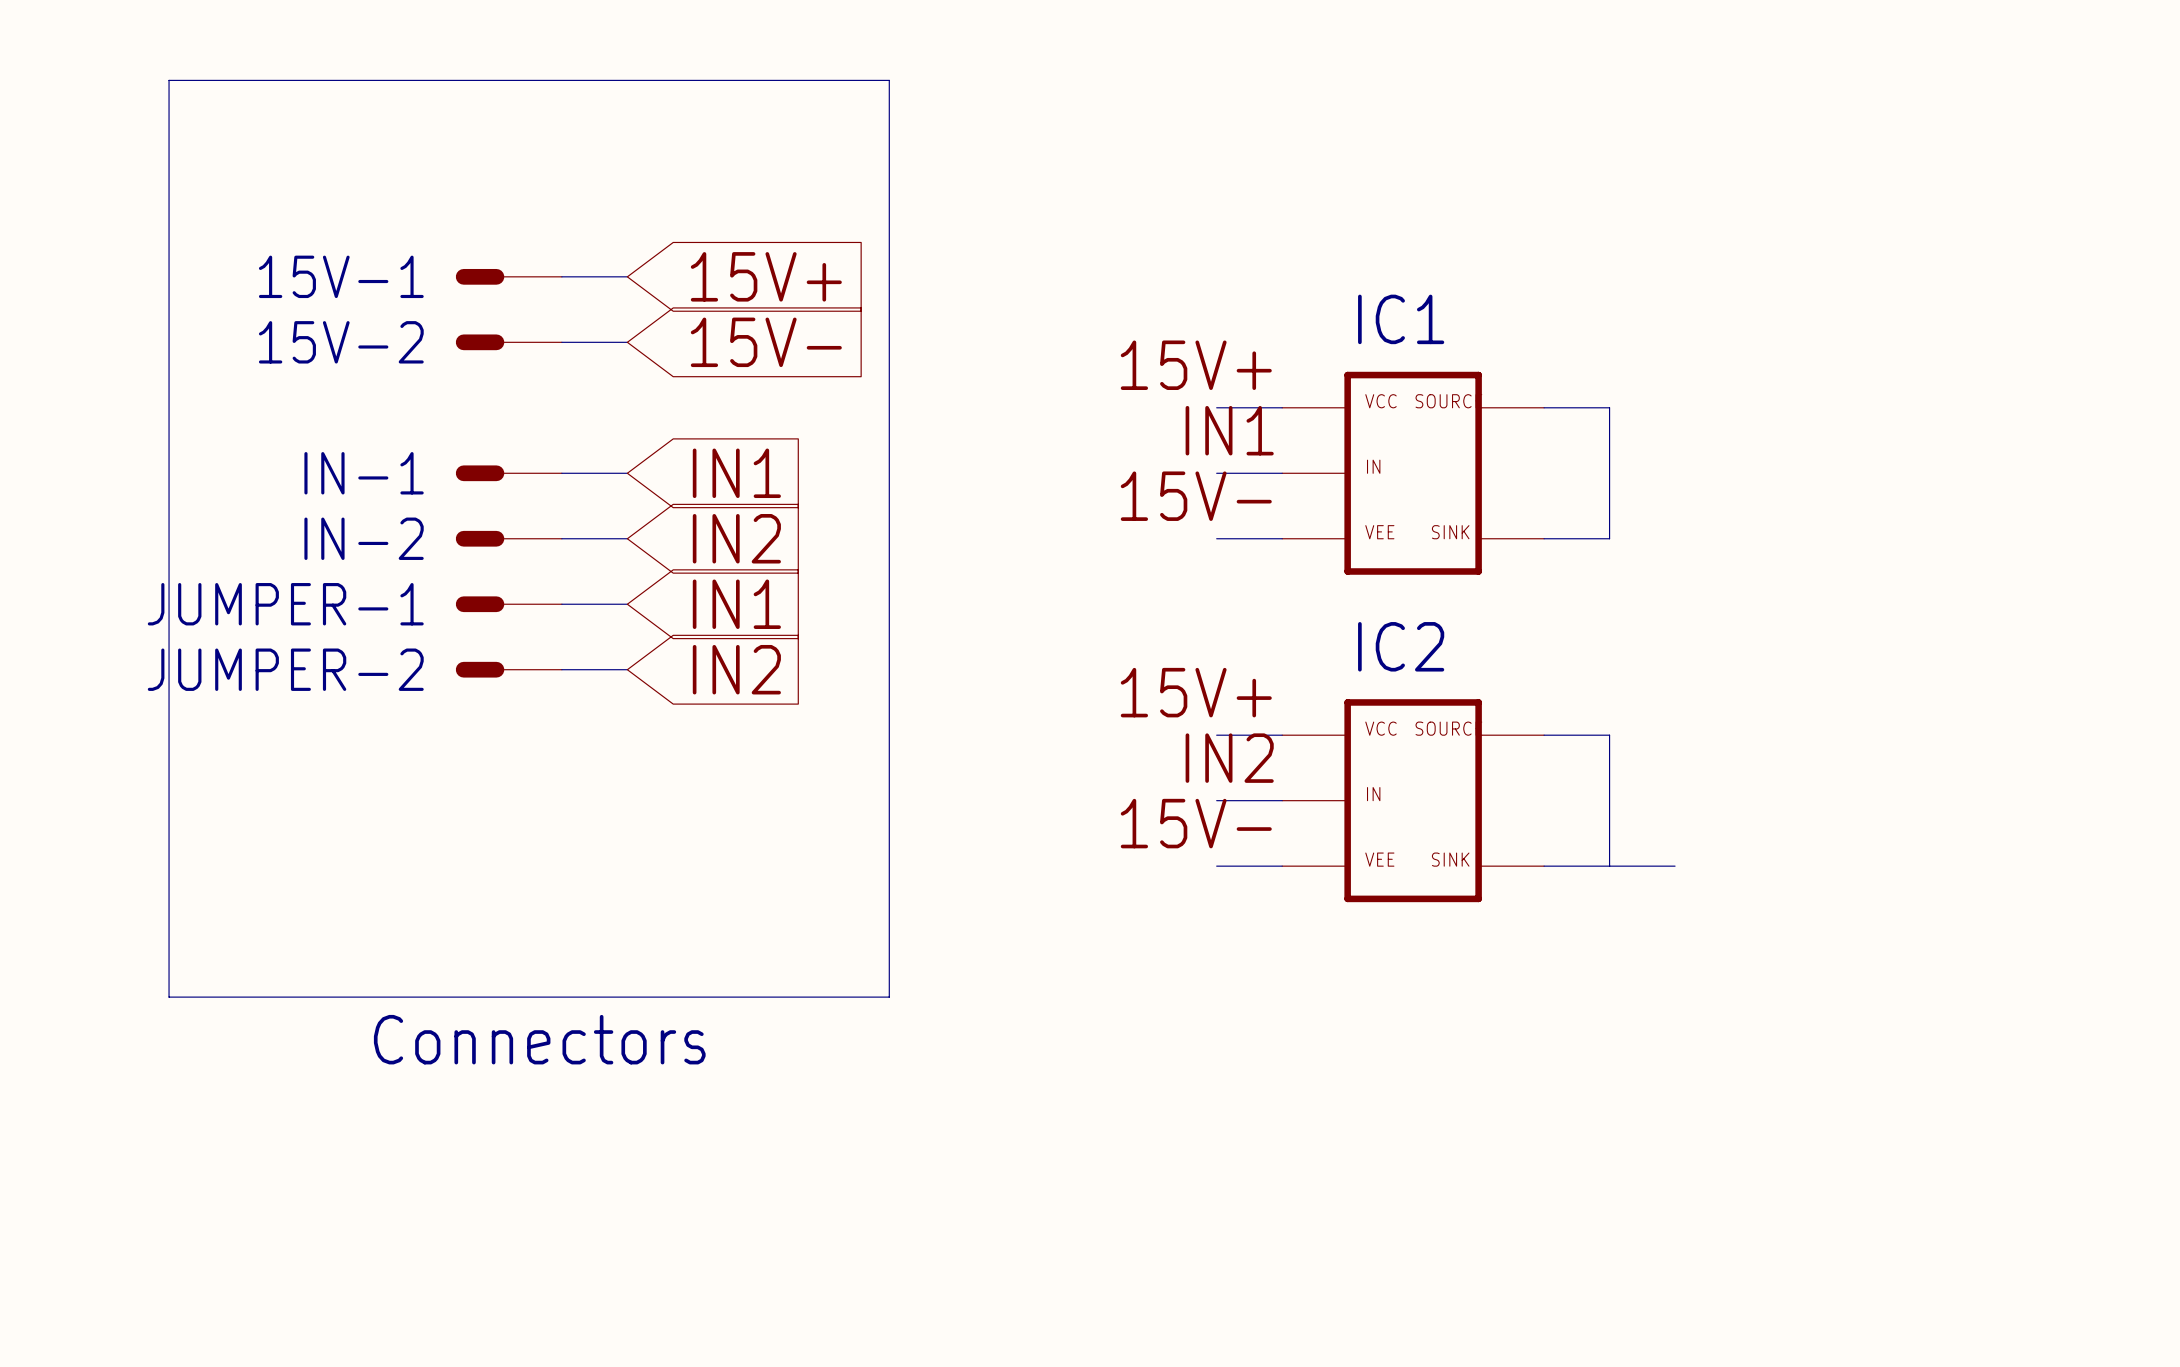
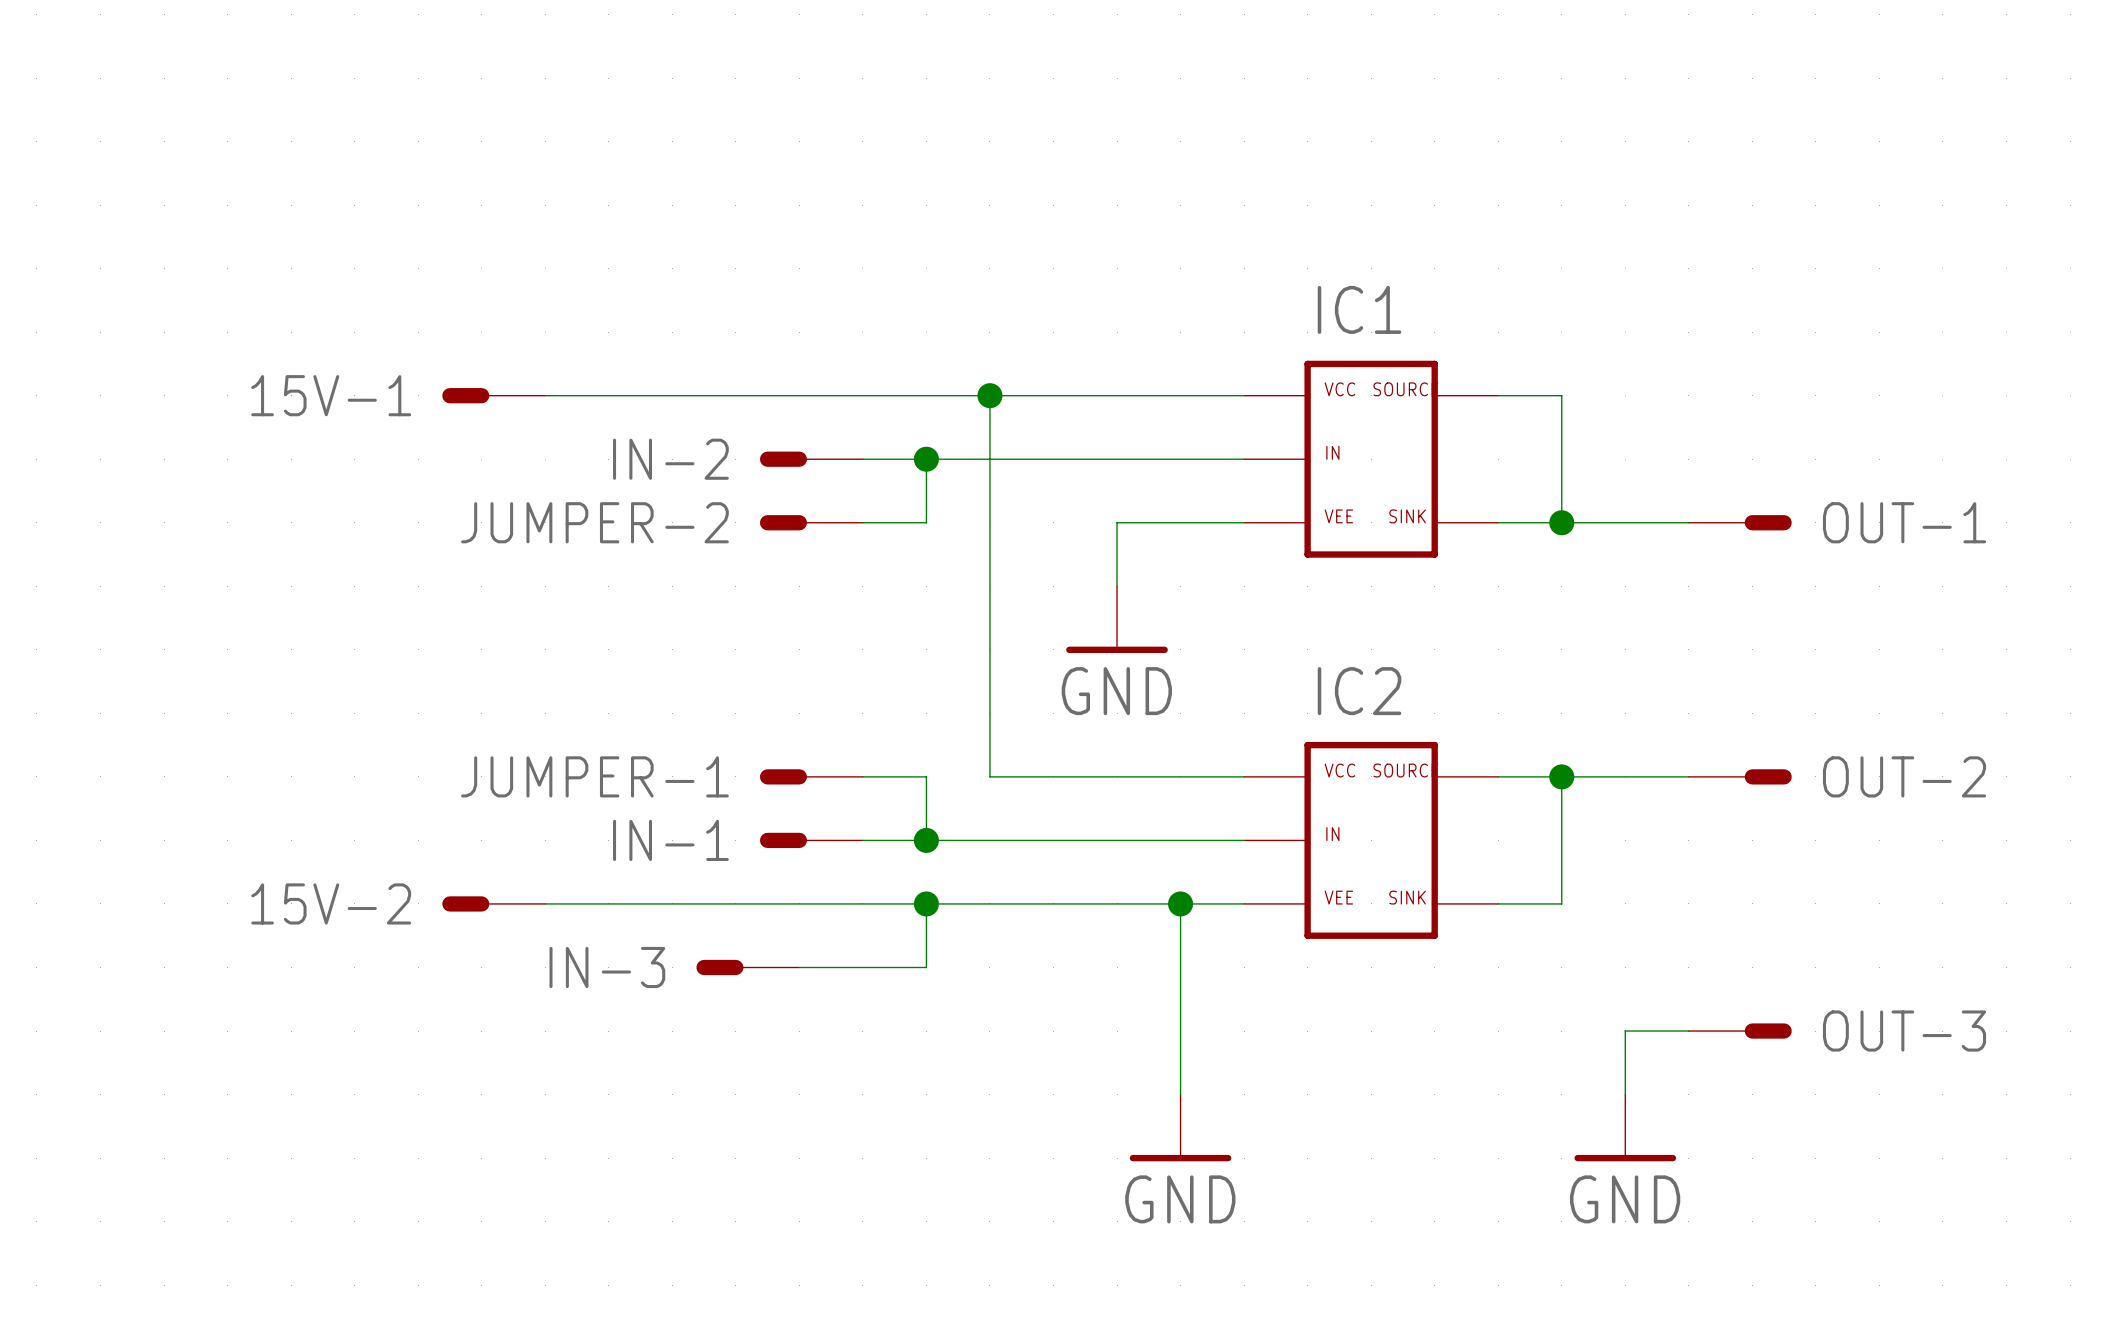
bus: (169, 80) (889, 80) (889, 997) (169, 997) (169, 80) -> none
15V-1 position: (508, 276) -> (493, 395)
wire: (561, 276) (627, 276) -> none
global label: 15V+ (766, 276) -> none
15V-2 position: (508, 342) -> (493, 903)
wire: (561, 342) (627, 342) -> none
global label: 15V- (766, 342) -> none
label: 15V+ (1196, 365) -> none
wire: none -> (545, 395) (1180, 395)
wire: none -> (989, 395) (989, 776) (1180, 776)
junction: none -> (989, 395)
label: IN1 (1229, 430) -> none
IN-1 position: (508, 473) -> (811, 840)
wire: (561, 473) (627, 473) -> none
global label: IN1 (736, 473) -> none
wire: none -> (862, 459) (1180, 459)
wire: none -> (926, 459) (926, 522) (862, 522)
junction: none -> (926, 459)
label: 15V- (1196, 496) -> none
IN-2 position: (508, 538) -> (811, 459)
wire: (561, 538) (627, 538) -> none
global label: IN2 (736, 538) -> none
wire: none -> (1180, 522) (1117, 522) (1117, 586)
junction: none -> (1561, 522)
OUT-1: none -> (1740, 522)
JUMPER-1 position: (508, 604) -> (811, 776)
wire: (561, 604) (627, 604) -> none
global label: IN1 (736, 604) -> none
power symbol: none -> GND (1117, 619)
JUMPER-2 position: (508, 669) -> (811, 522)
wire: (561, 669) (627, 669) -> none
global label: IN2 (736, 669) -> none
label: 15V+ (1196, 692) -> none
wire: (1216, 735) (1282, 735) -> none
wire: (1544, 735) (1609, 735) (1609, 800) -> none
label: IN2 (1229, 758) -> none
wire: none -> (862, 776) (926, 776) (926, 840)
IC2 position: (1413, 800) -> (1371, 840)
wire: none -> (1498, 776) (1688, 776)
junction: none -> (1561, 776)
OUT-2: none -> (1740, 776)
label: 15V- (1196, 823) -> none
wire: none -> (862, 840) (1180, 840)
junction: none -> (926, 840)
wire: (1544, 866) (1675, 866) -> (1561, 522) (1688, 522)
wire: none -> (1561, 840) (1561, 903) (1498, 903)
wire: none -> (545, 903) (1244, 903)
wire: none -> (926, 903) (926, 967) (799, 967)
junction: none -> (926, 903)
wire: none -> (1180, 903) (1180, 1094)
junction: none -> (1180, 903)
IN-3: none -> (747, 967)
text: Connectors (539, 1039) -> none
wire: none -> (1688, 1031) (1625, 1031) (1625, 1094)
OUT-3: none -> (1740, 1031)
power symbol: none -> GND (1180, 1127)
power symbol: none -> GND (1625, 1127)

